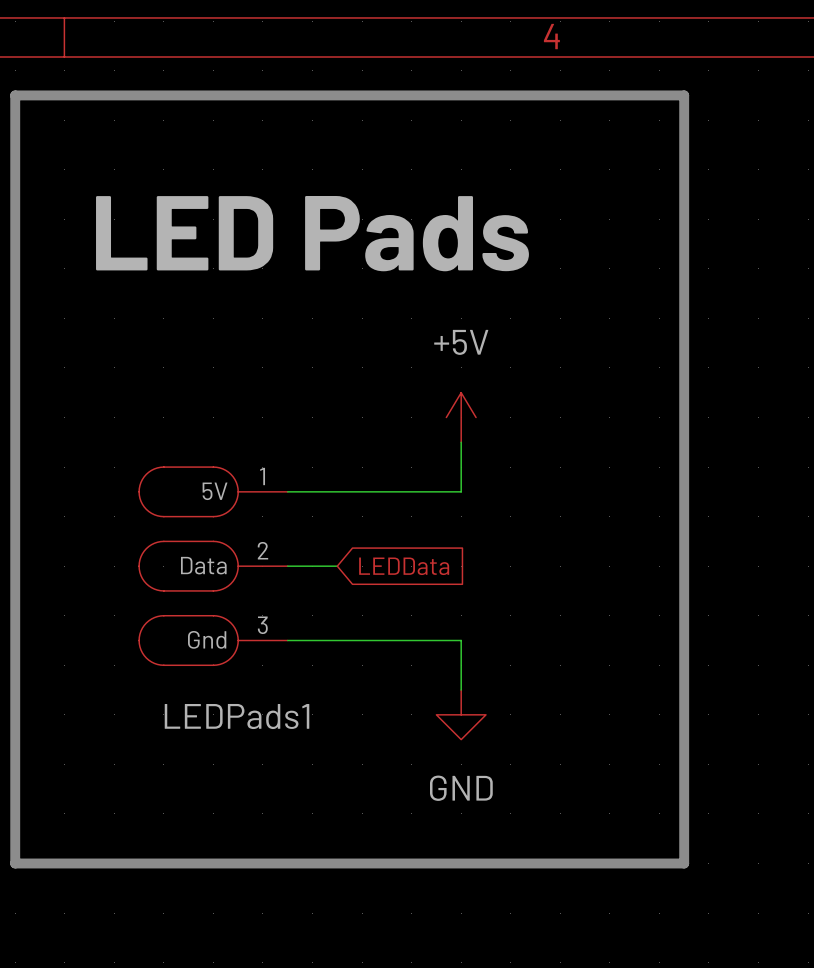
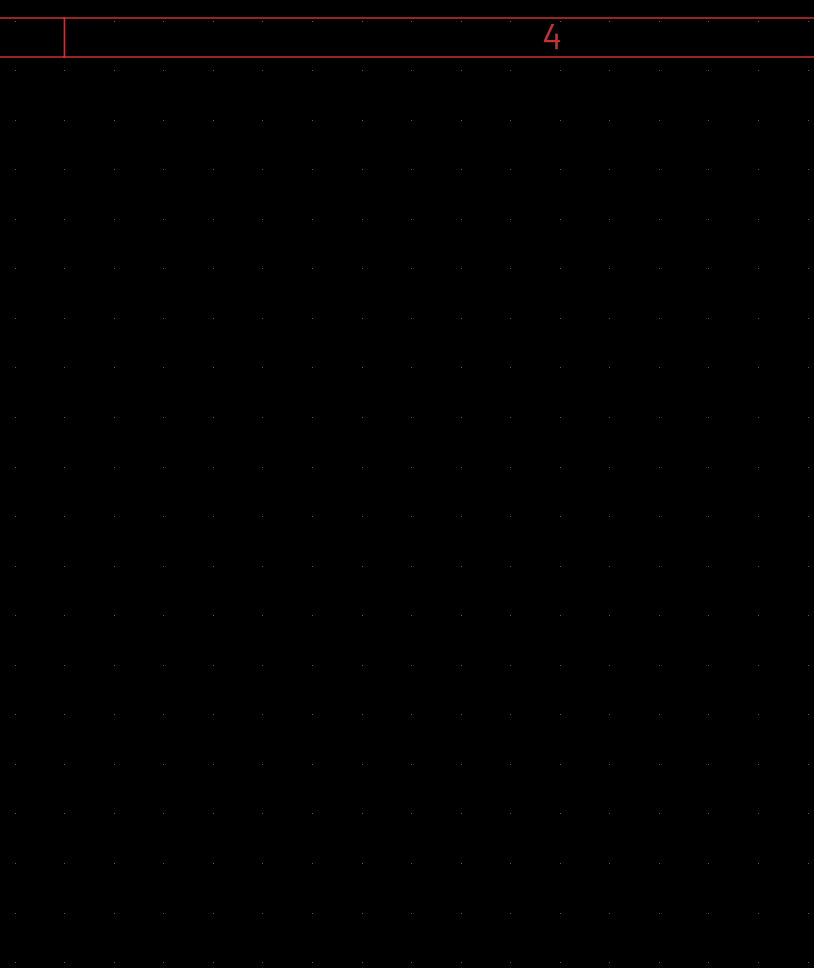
line: (15, 95) (684, 95) (684, 863) (15, 863) (15, 95) -> none
label: LED Pads (312, 233) -> none
power symbol: +5V (461, 417) -> none
wire: (461, 442) (461, 491) (287, 491) -> none
LEDPads1: (213, 566) -> none
wire: (287, 566) (337, 566) -> none
global label: LEDData (404, 566) -> none
wire: (287, 640) (461, 640) (461, 690) -> none
power symbol: GND (461, 714) -> none

